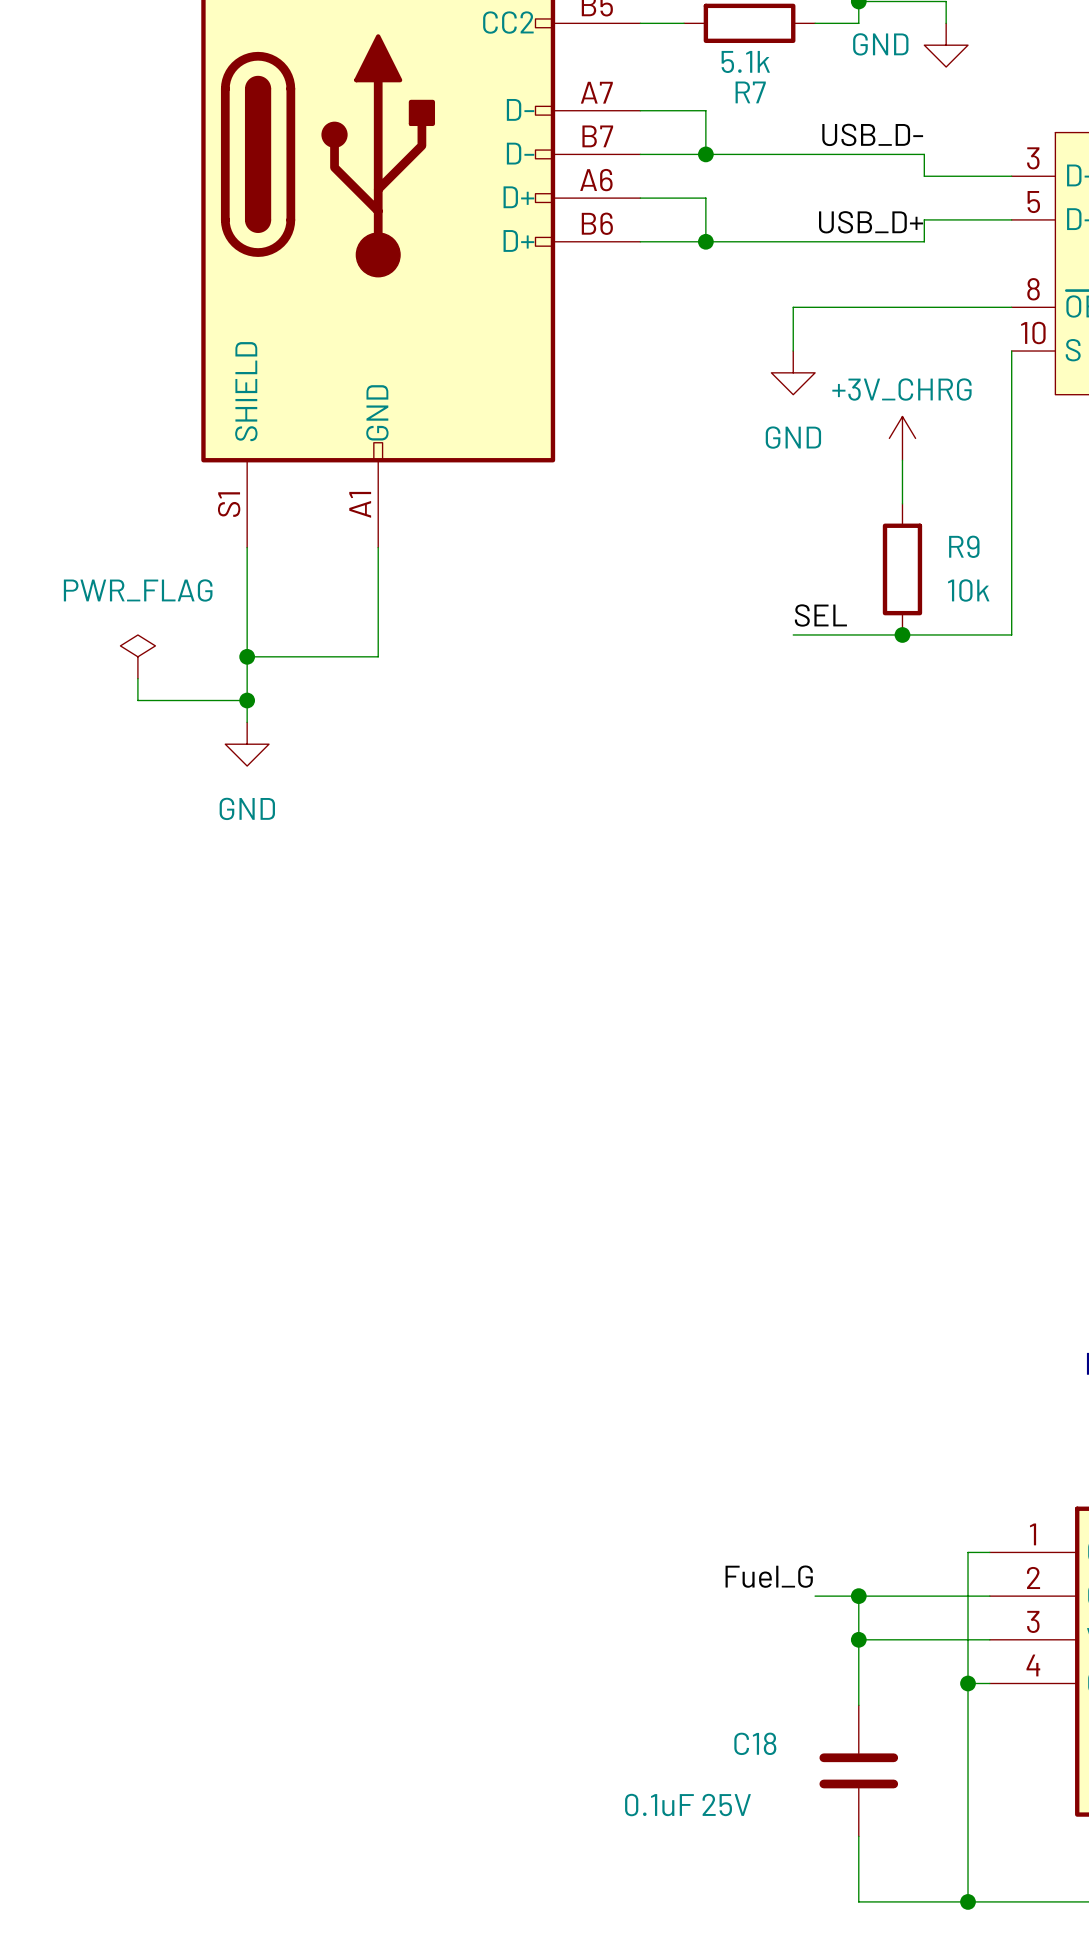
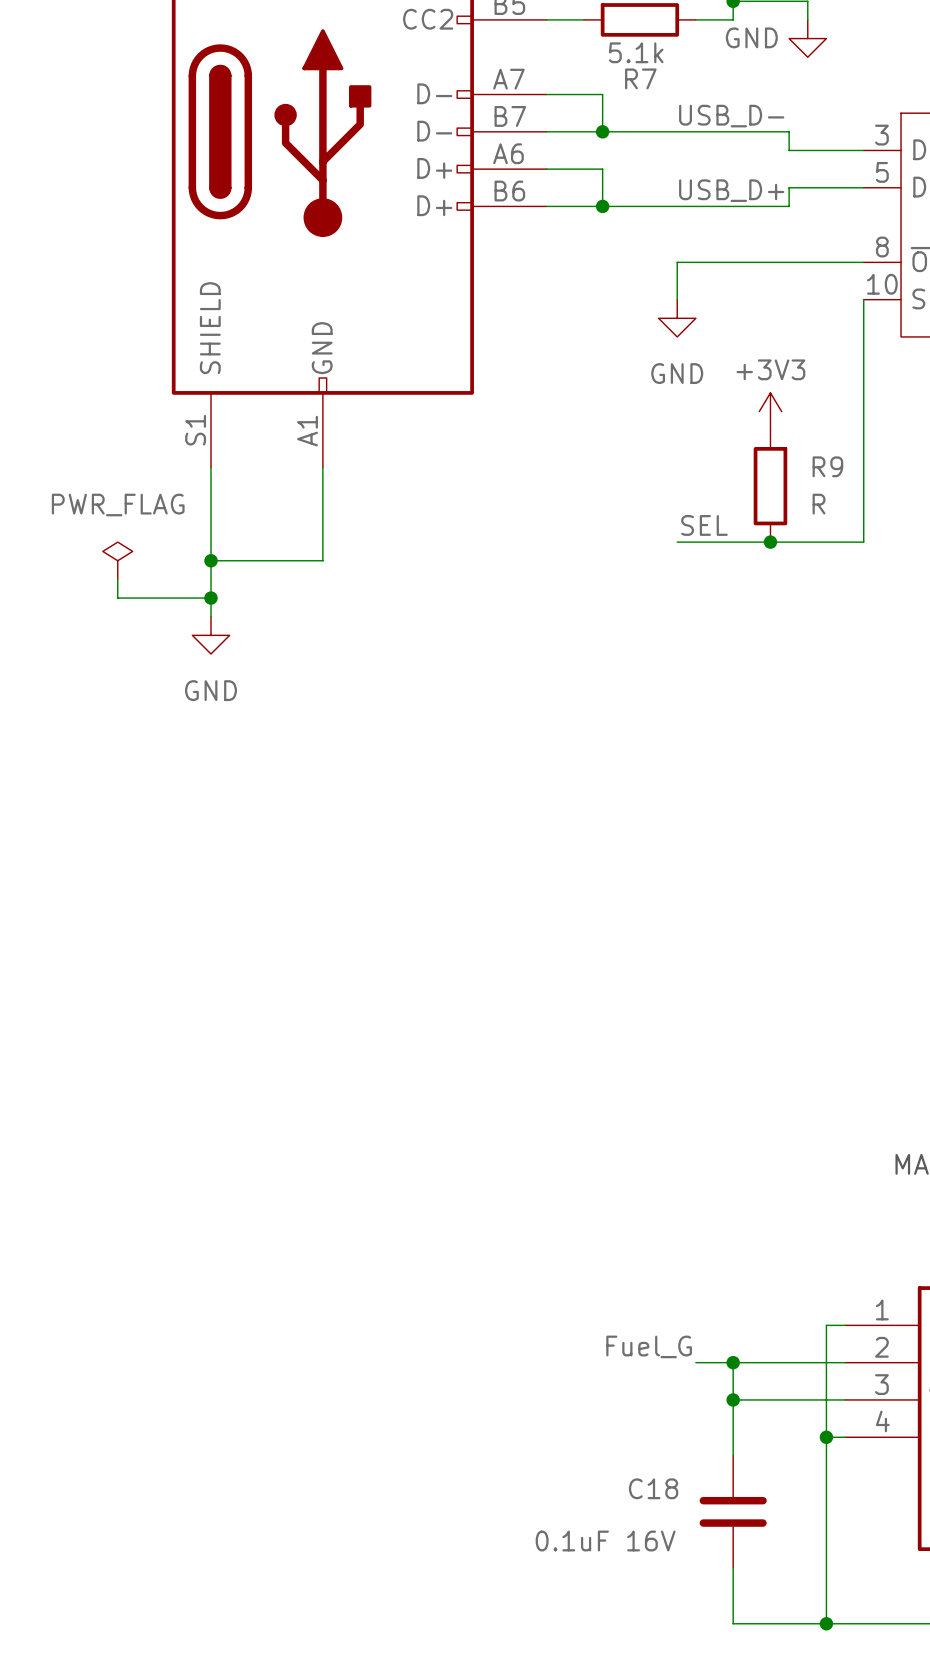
power symbol: +3V_CHRG (902, 438) -> none
power symbol: none -> +3V3 (770, 411)
R9 value: 10k (968, 590) -> R (819, 504)
C18 value: 0.1uF 25V (687, 1805) -> 0.1uF 16V (605, 1541)

